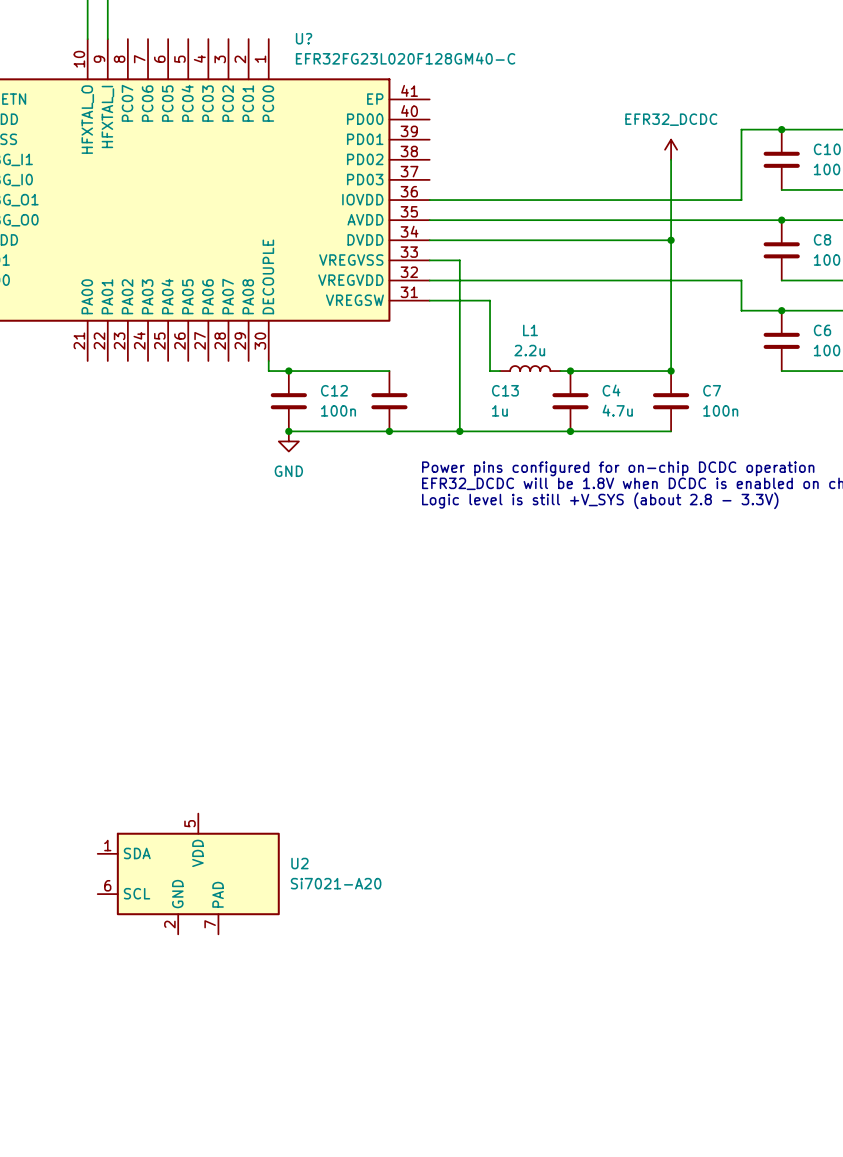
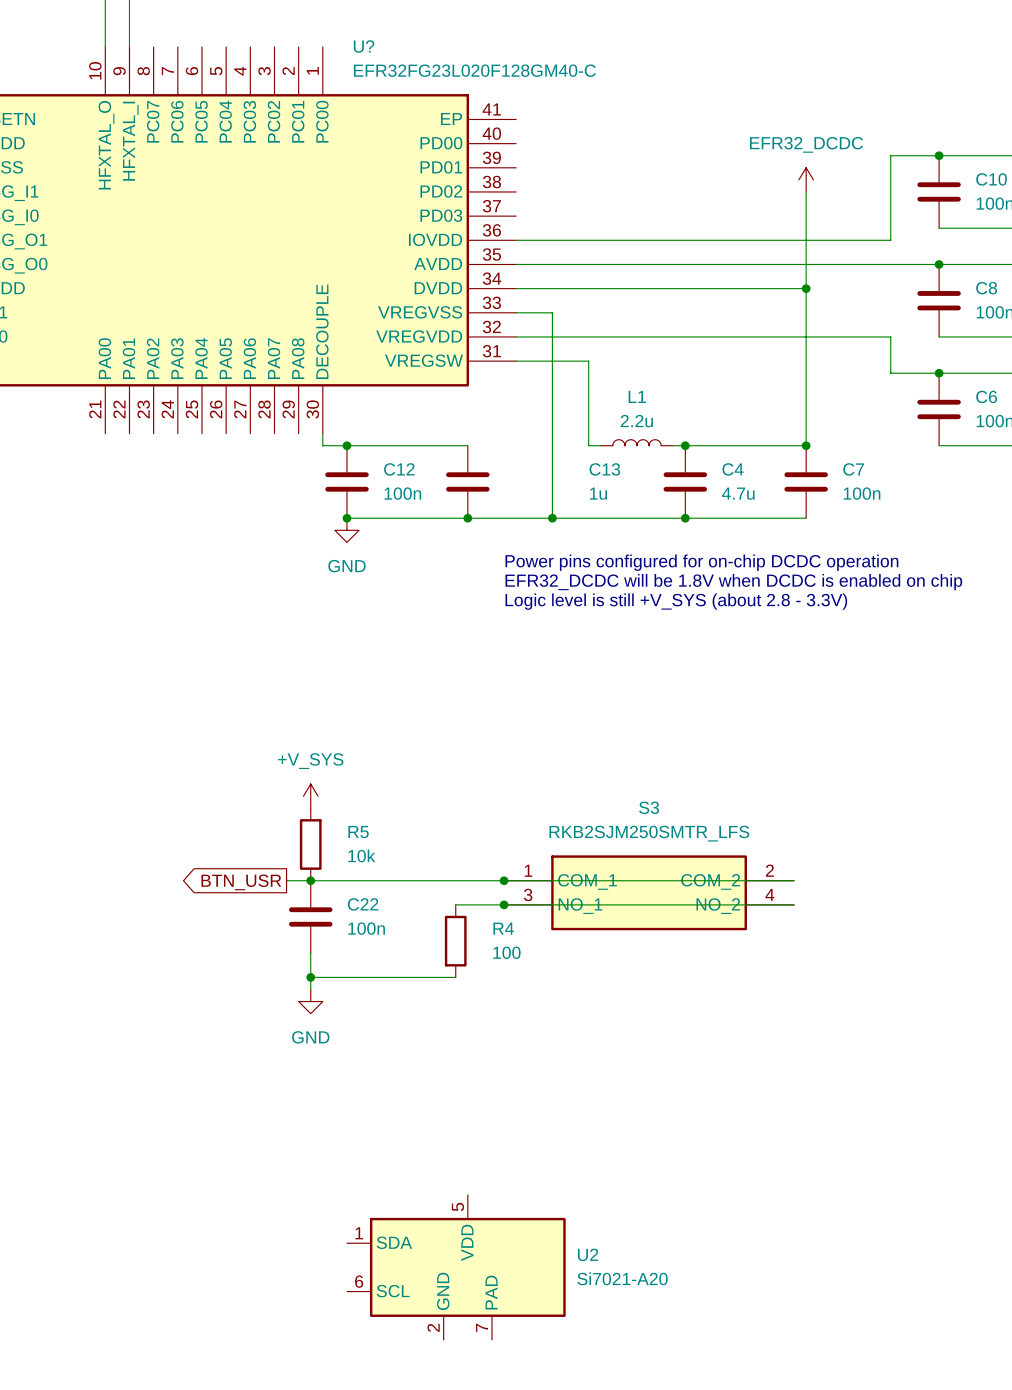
power symbol: none -> +V_SYS (310, 796)
R5: none -> 10k (310, 844)
global label: none -> BTN_USR (241, 882)
wire: none -> (286, 880) (794, 880)
junction: none -> (310, 880)
junction: none -> (504, 880)
S3: none -> RKB2SJM250SMTR_LFS (649, 892)
wire: none -> (455, 904) (794, 904)
junction: none -> (504, 904)
C22: none -> 100n (310, 916)
R4: none -> 100 (455, 941)
wire: none -> (310, 953) (310, 989)
wire: none -> (310, 977) (455, 977)
junction: none -> (310, 977)
power symbol: none -> GND (310, 1001)
U2 position: (188, 873) -> (456, 1267)

